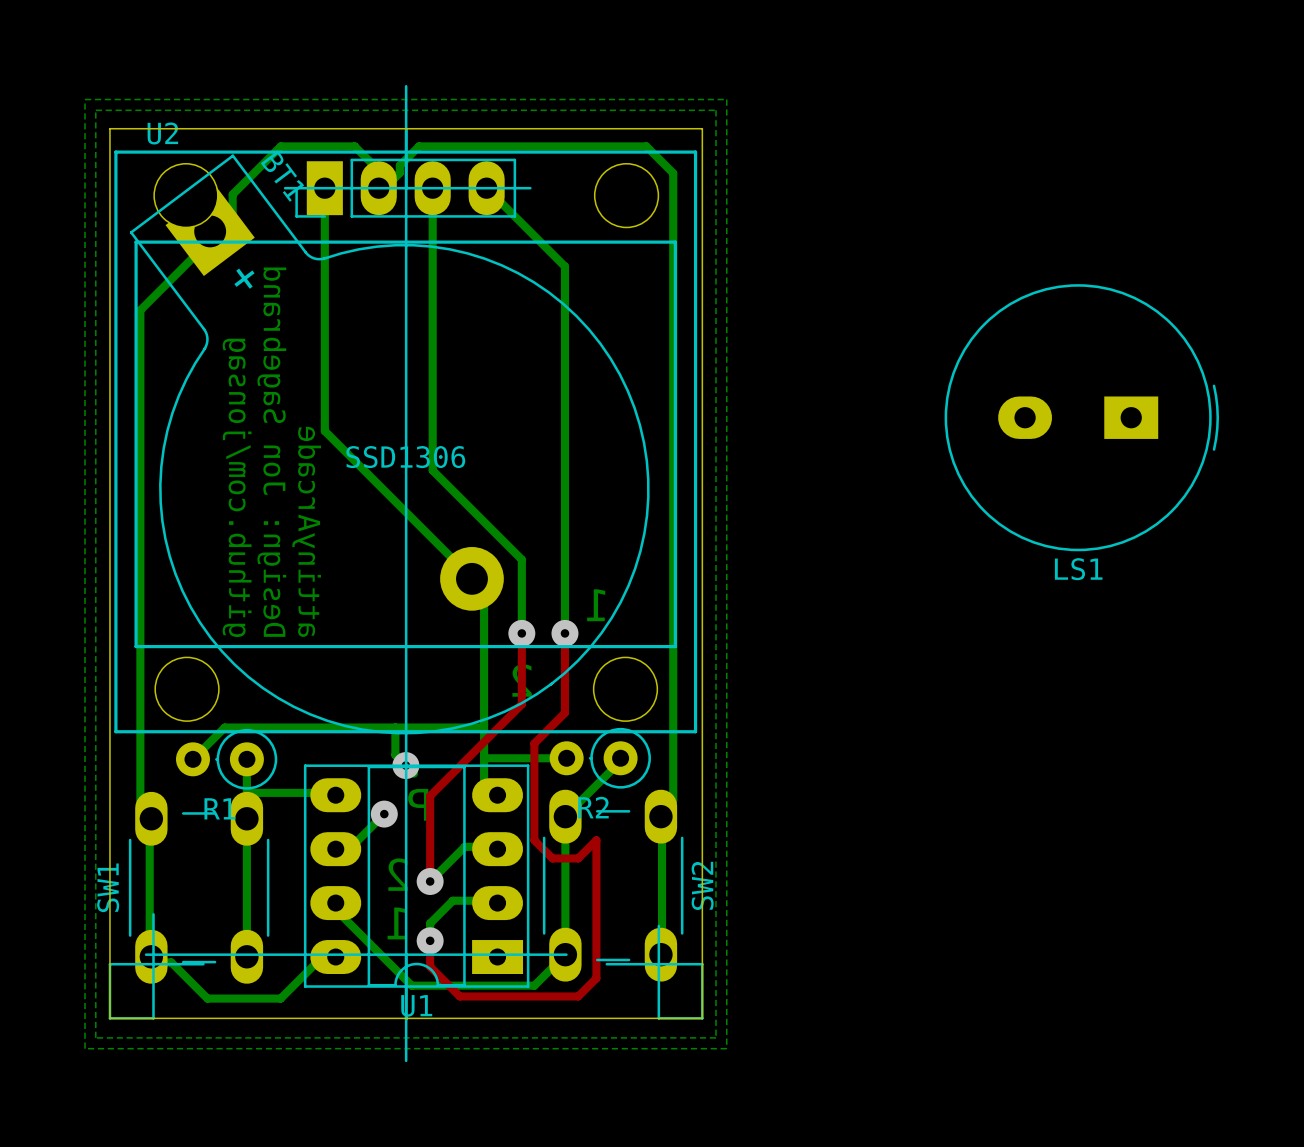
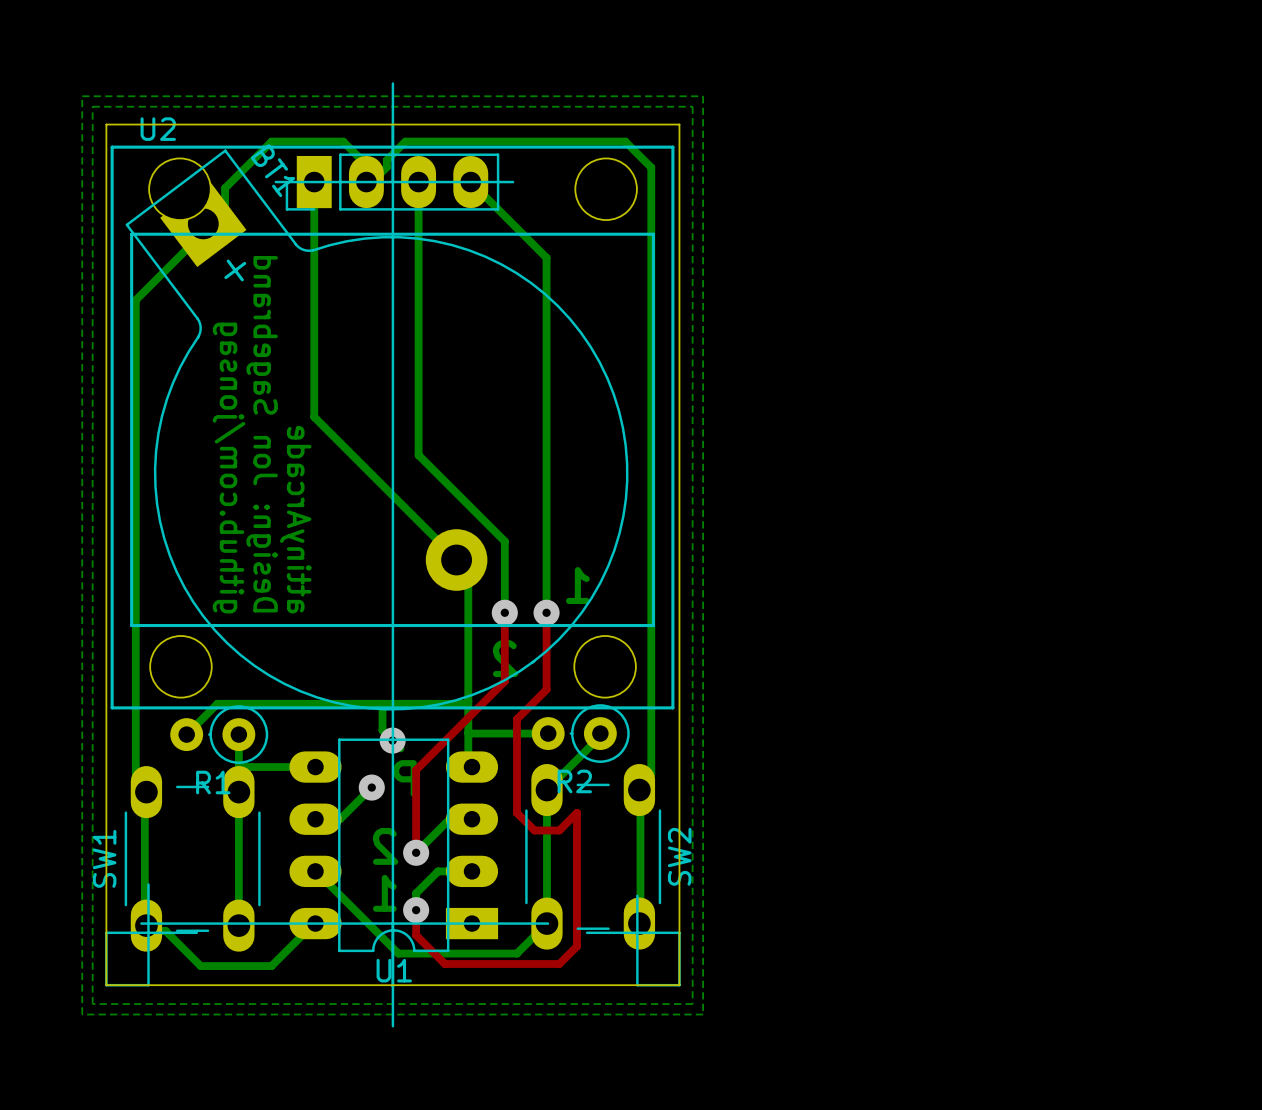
LS1: (1081, 417) -> none
U2 text: SSD1306 (405, 457) -> none
U1 footprint: [303, 764, 530, 988] -> [289, 738, 499, 953]

